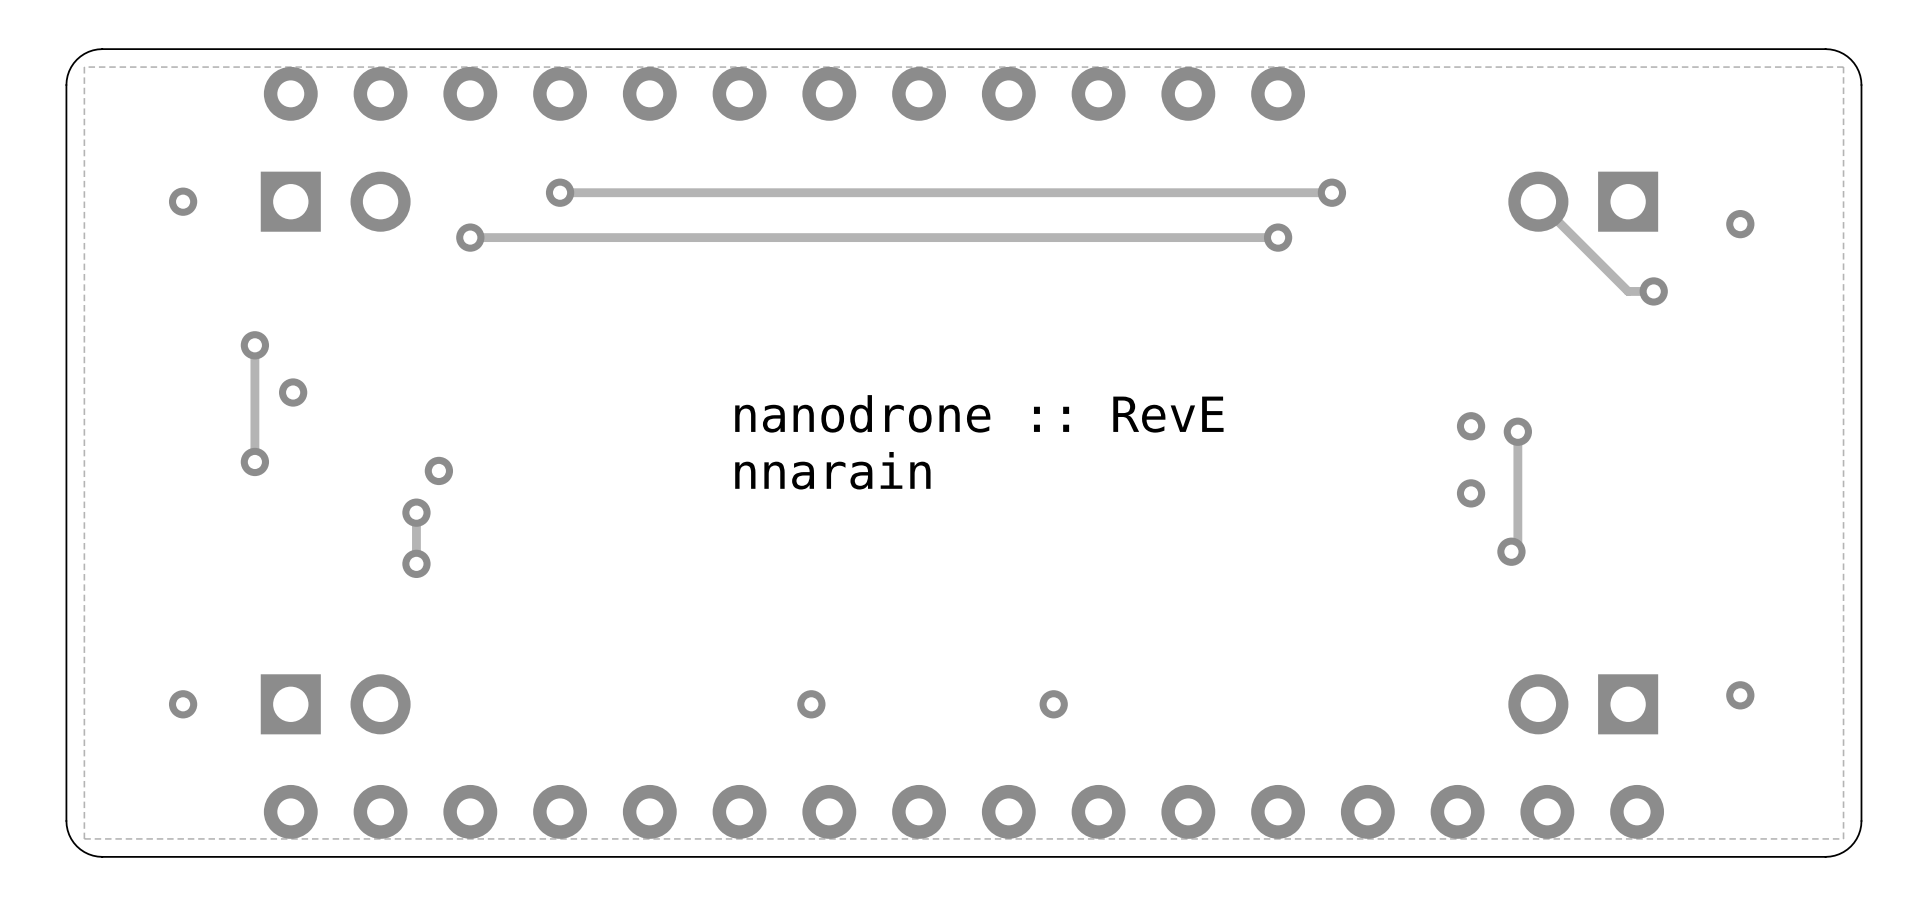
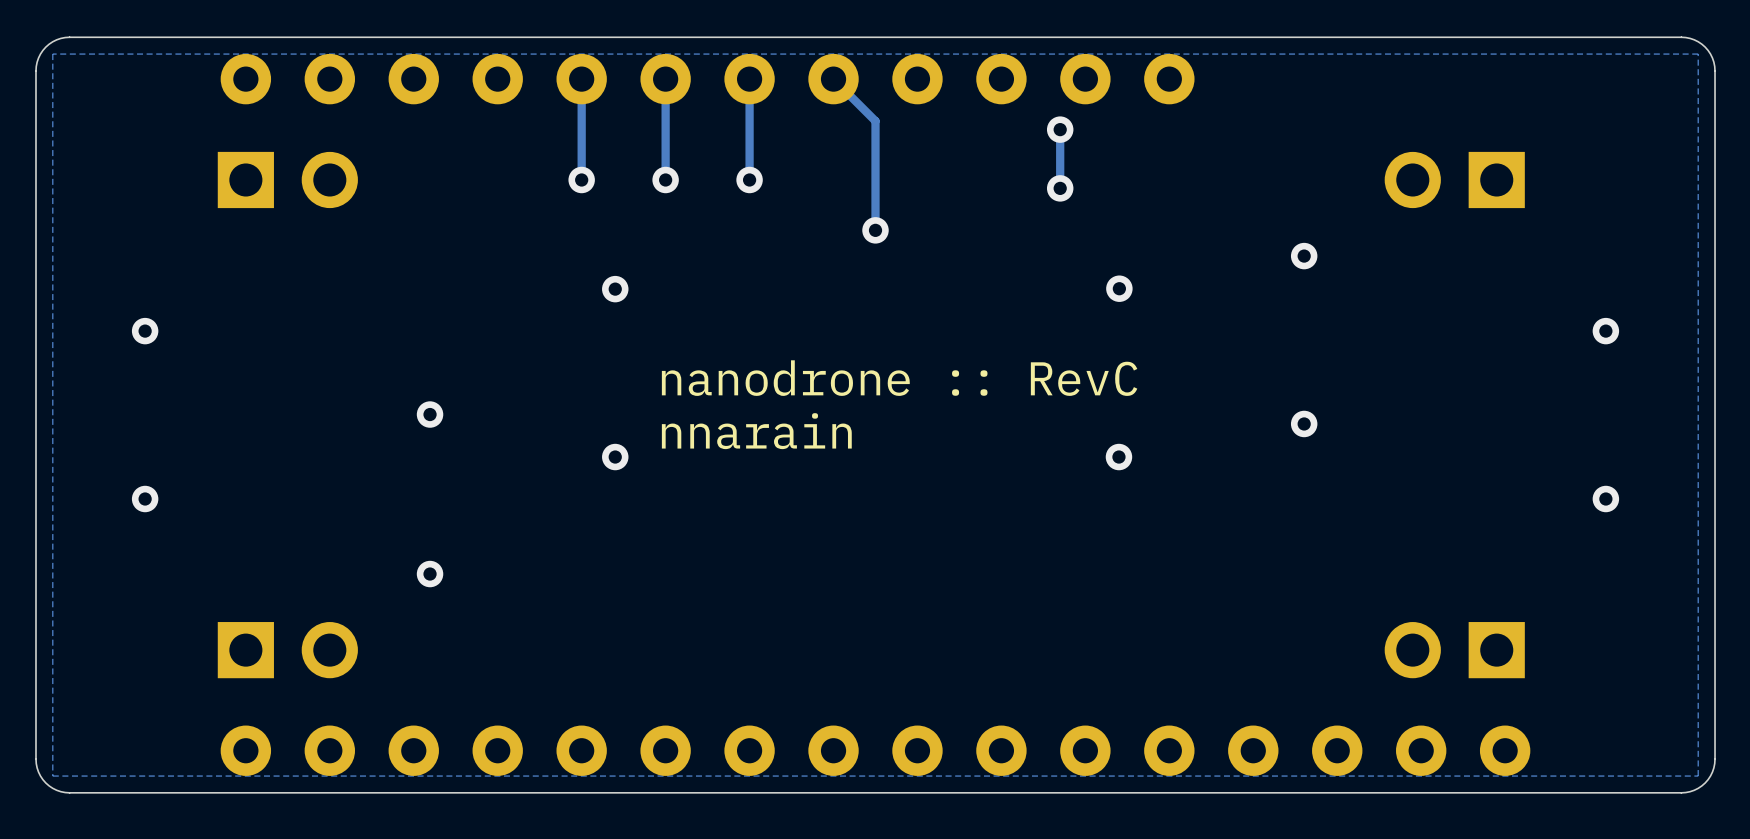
track: none -> (581, 79) (581, 179)
track: none -> (665, 79) (665, 179)
track: none -> (749, 79) (749, 179)
track: none -> (833, 79) (875, 121) (875, 230)
track: none -> (1060, 129) (1060, 188)
via: none -> (1060, 129)
via: (560, 192) -> none
track: (1331, 192) (560, 192) -> none
via: (1331, 192) -> none
via: (183, 201) -> none
via: none -> (581, 179)
via: none -> (665, 179)
via: none -> (749, 179)
track: (1538, 201) (1628, 291) (1653, 291) -> none
via: none -> (1060, 188)
via: (1740, 224) -> none
via: (470, 237) -> none
track: (1278, 237) (470, 237) -> none
via: (1278, 237) -> none
via: none -> (875, 230)
via: none -> (1304, 256)
via: (1653, 291) -> none
via: none -> (1119, 288)
via: none -> (615, 289)
track: (254, 345) (254, 461) -> none
via: (254, 345) -> none
via: none -> (145, 331)
via: none -> (1605, 331)
via: (293, 392) -> none
text: nanodrone :: RevE (979, 413) -> nanodrone :: RevC (899, 378)
via: (1471, 426) -> none
track: (1517, 431) (1517, 545) (1511, 551) -> none
via: (1517, 431) -> none
via: none -> (430, 414)
via: (254, 461) -> none
via: none -> (1304, 423)
via: (438, 470) -> none
via: (1471, 493) -> none
via: none -> (615, 457)
via: none -> (1118, 457)
track: (416, 512) (416, 563) -> none
via: (416, 512) -> none
via: none -> (145, 499)
via: none -> (1605, 499)
via: (1511, 551) -> none
via: (416, 563) -> none
via: none -> (430, 574)
via: (1740, 695) -> none
via: (183, 704) -> none
via: (811, 704) -> none
via: (1053, 704) -> none

